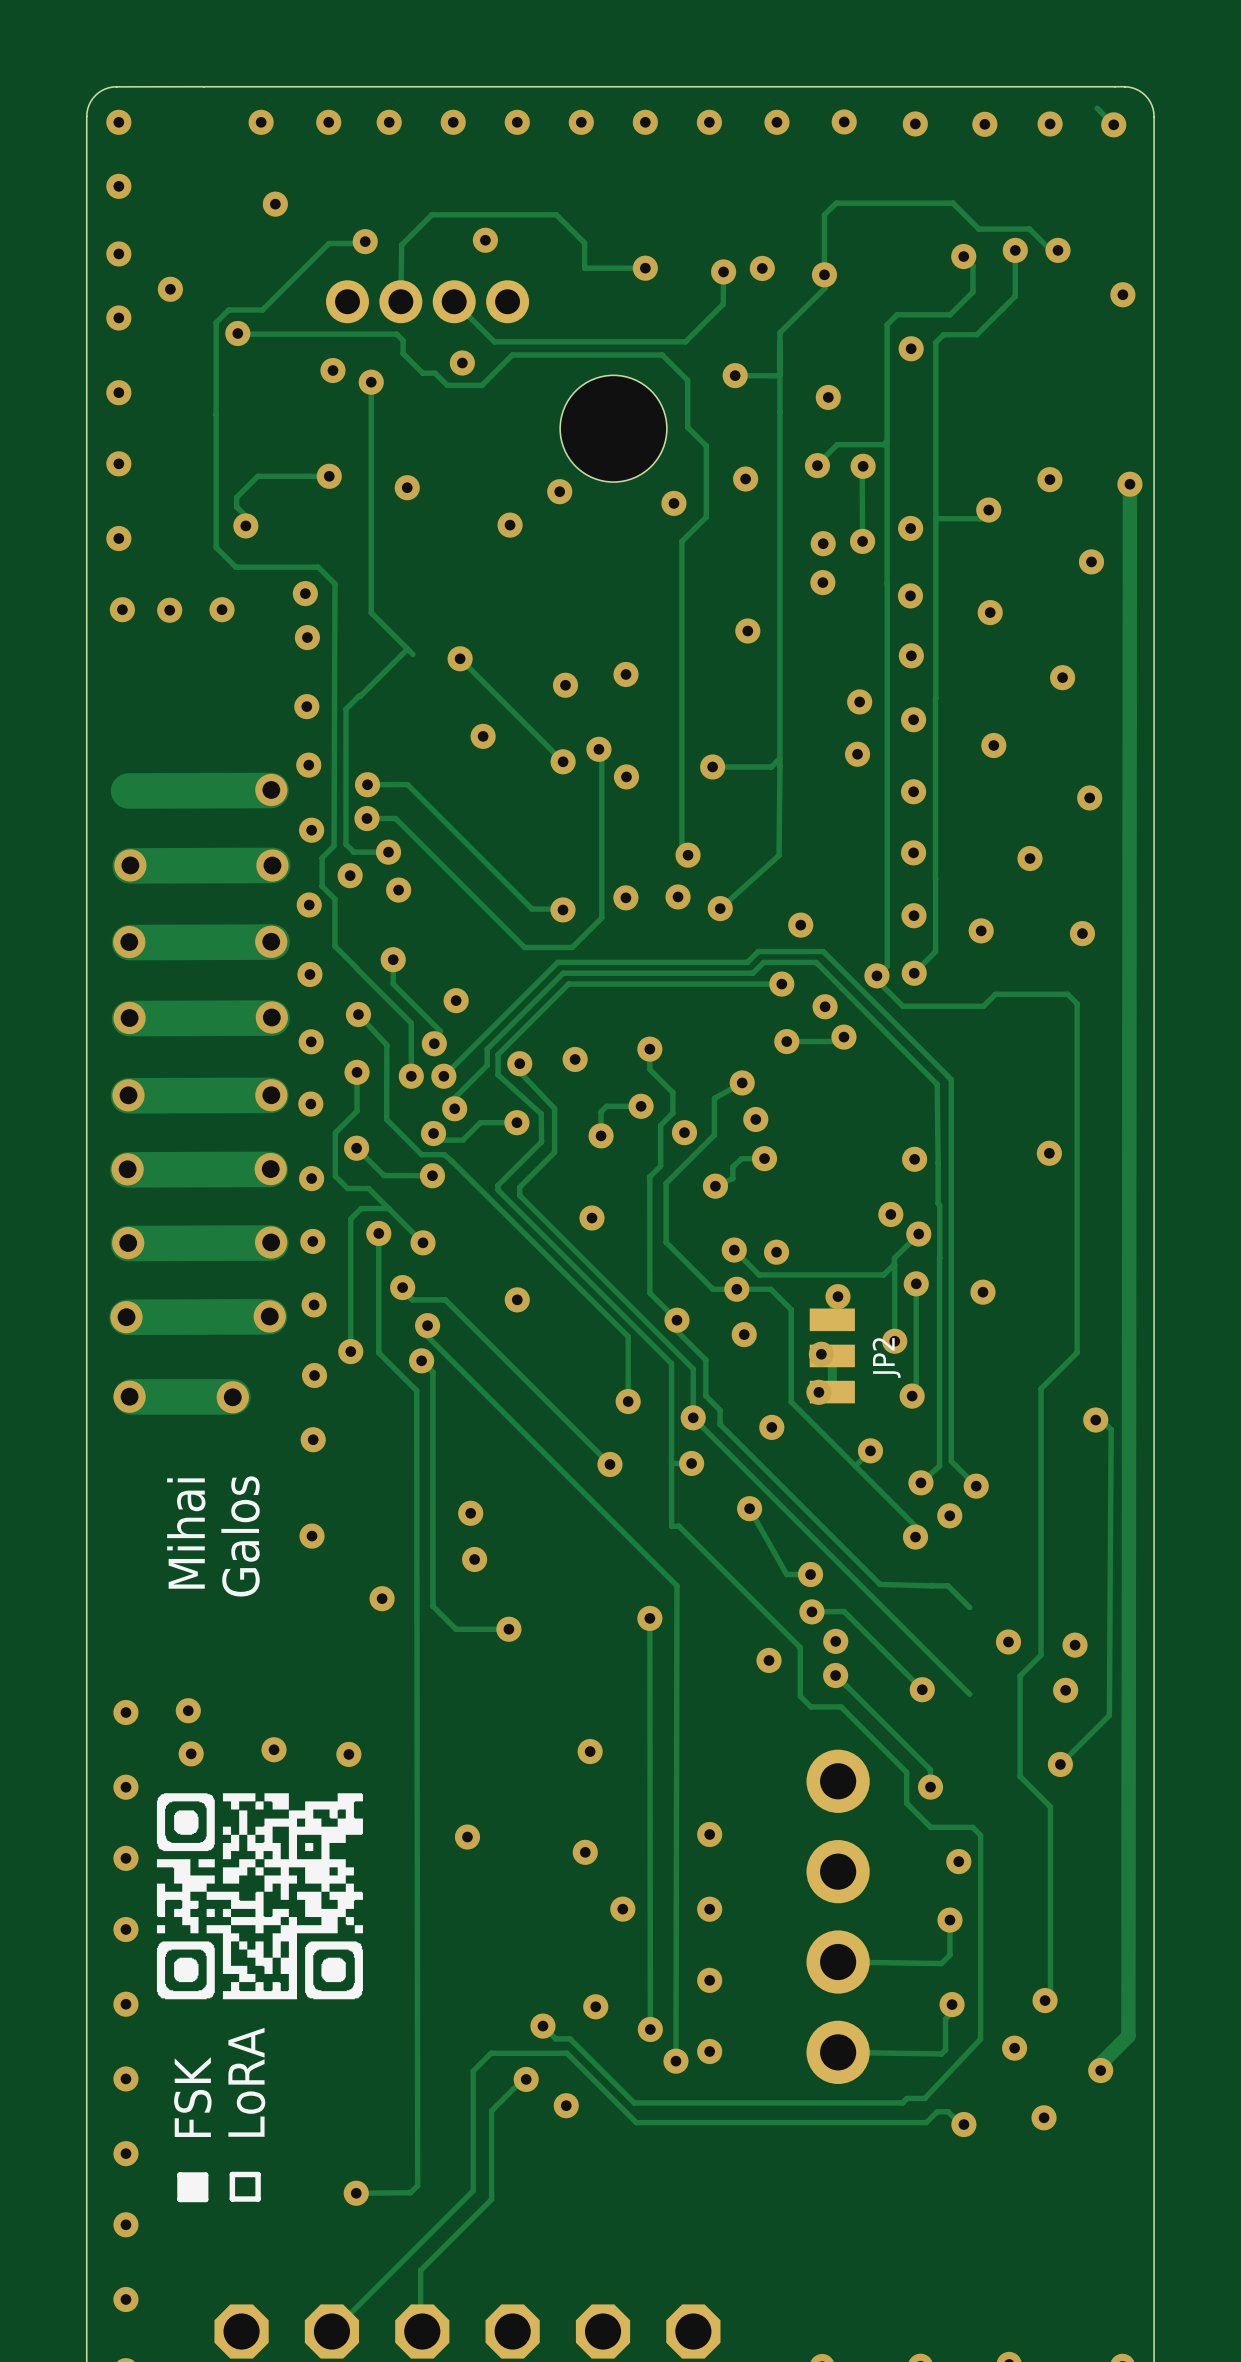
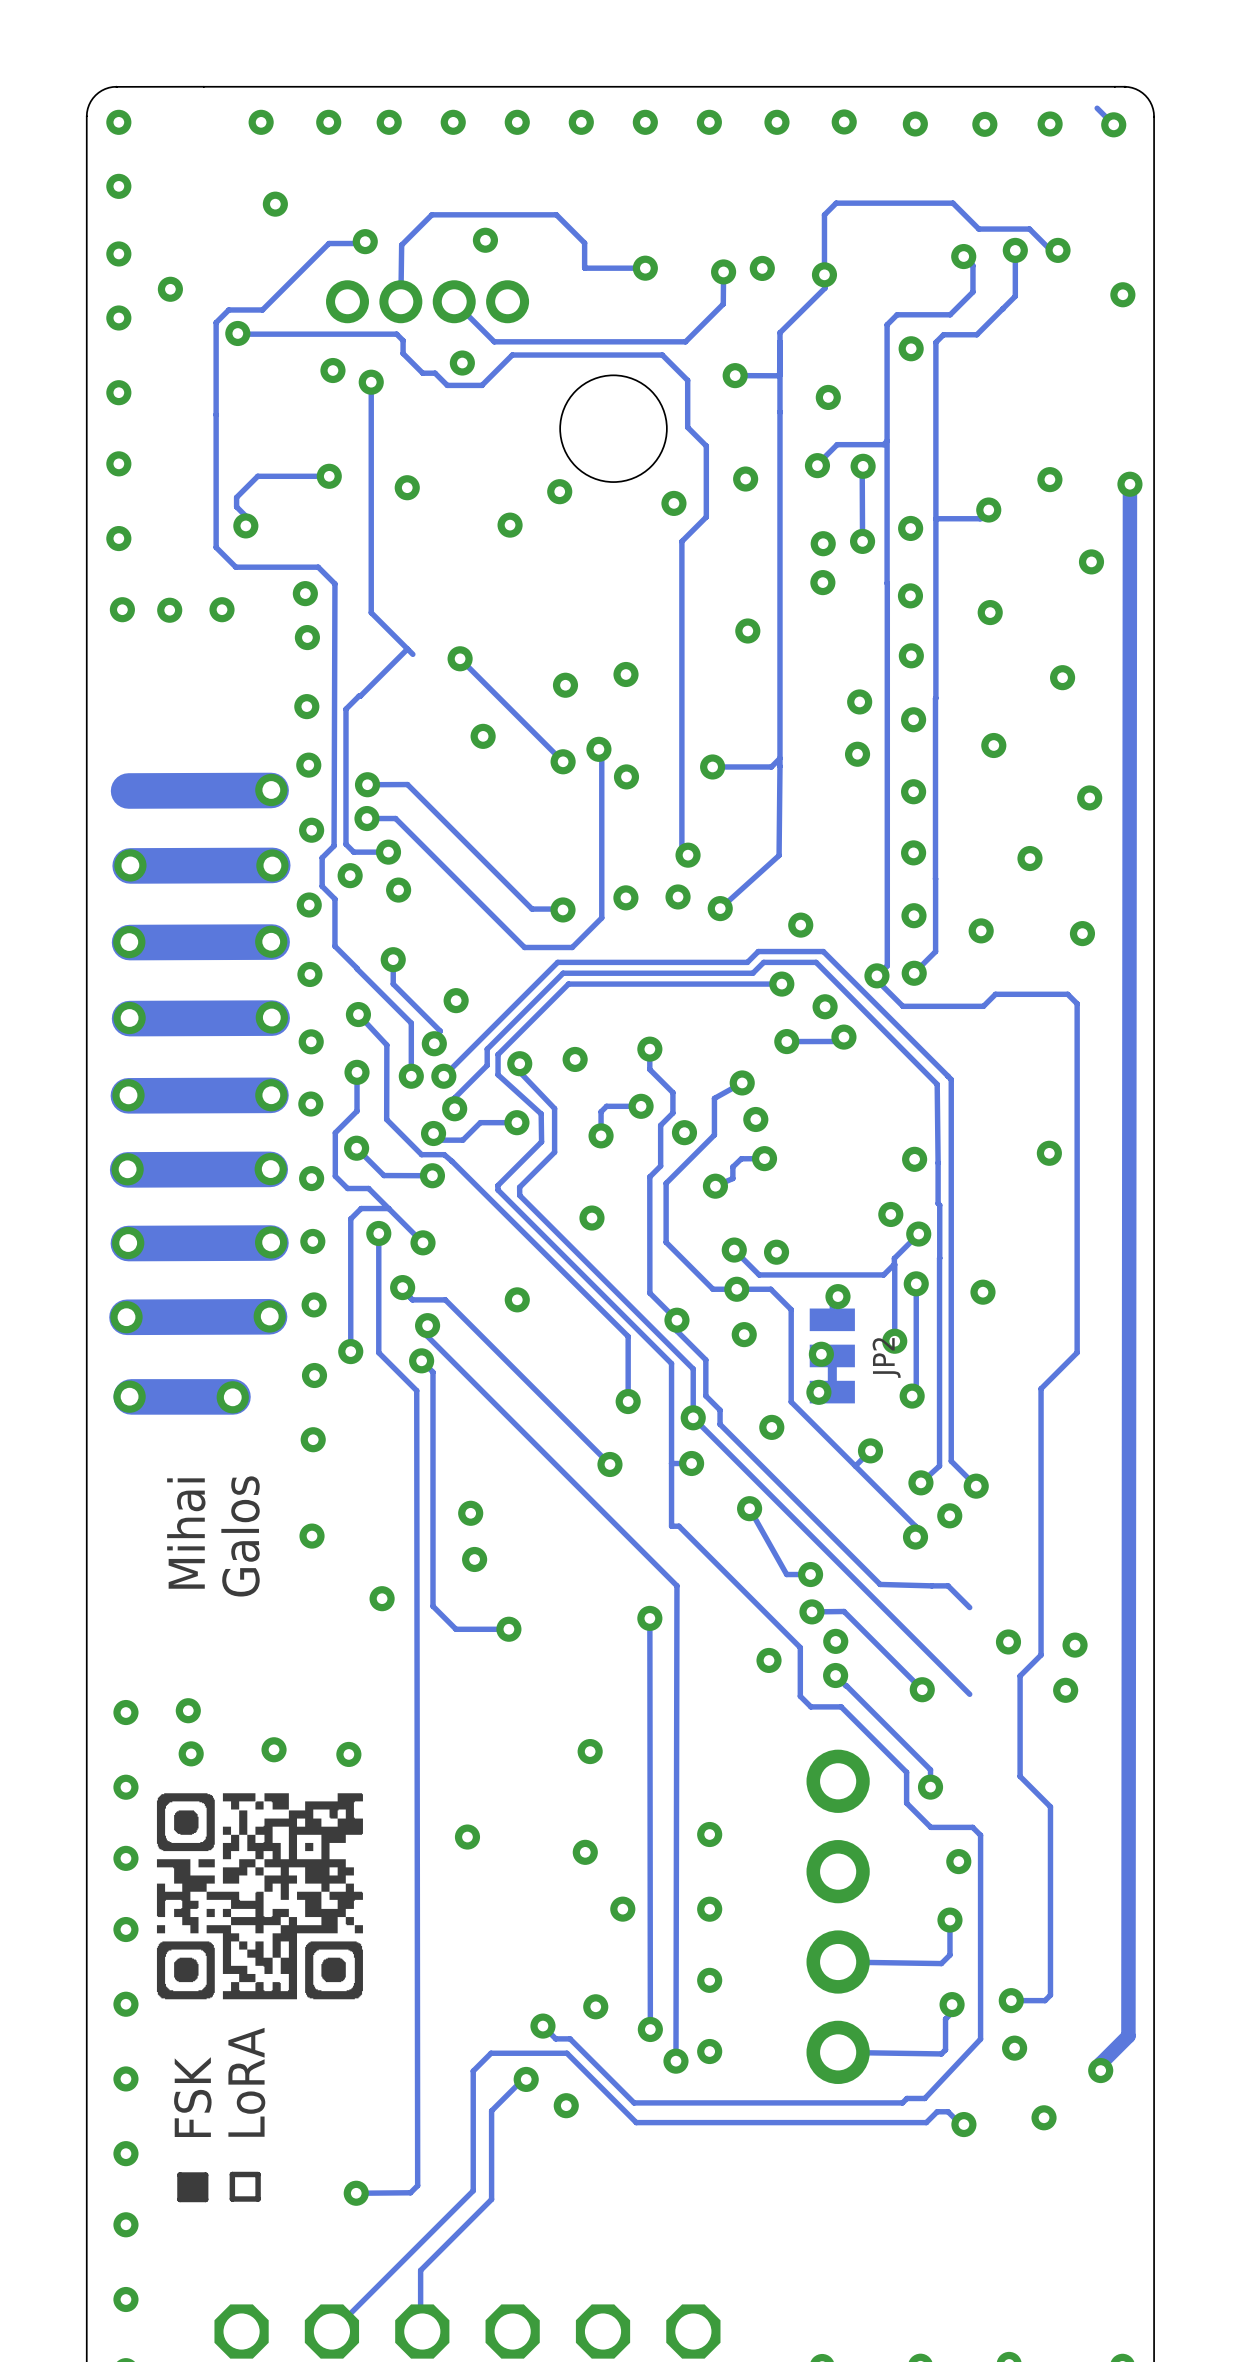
track: (1095, 1420) (1101, 1420) (1111, 1429) (1109, 1715) (1060, 1764) -> none
via: (1095, 1420) -> none
via: (1060, 1764) -> none
track: none -> (1045, 2000) (1011, 2000)
via position: (1045, 2000) -> (1011, 2000)

